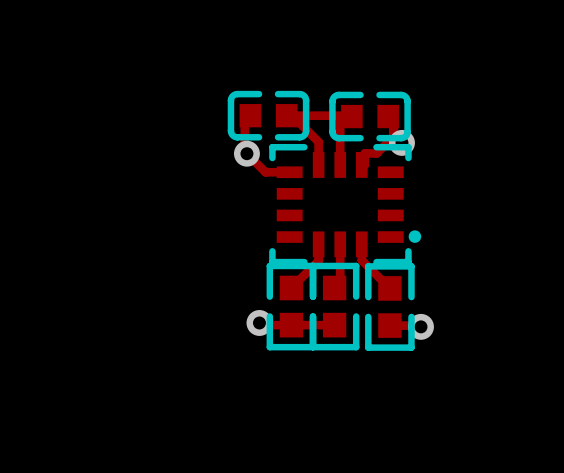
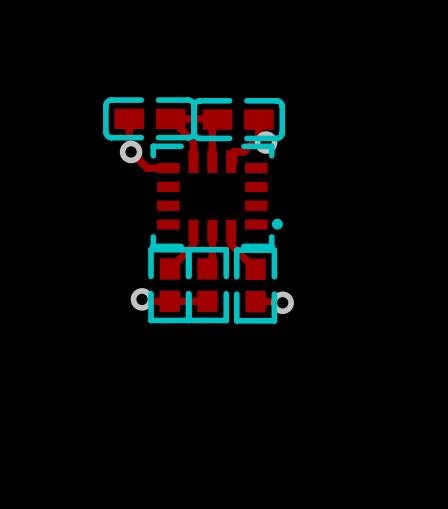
part footprint: [227, 90, 310, 141] -> [103, 97, 197, 141]
part footprint: [329, 91, 411, 142] -> [191, 97, 286, 142]

